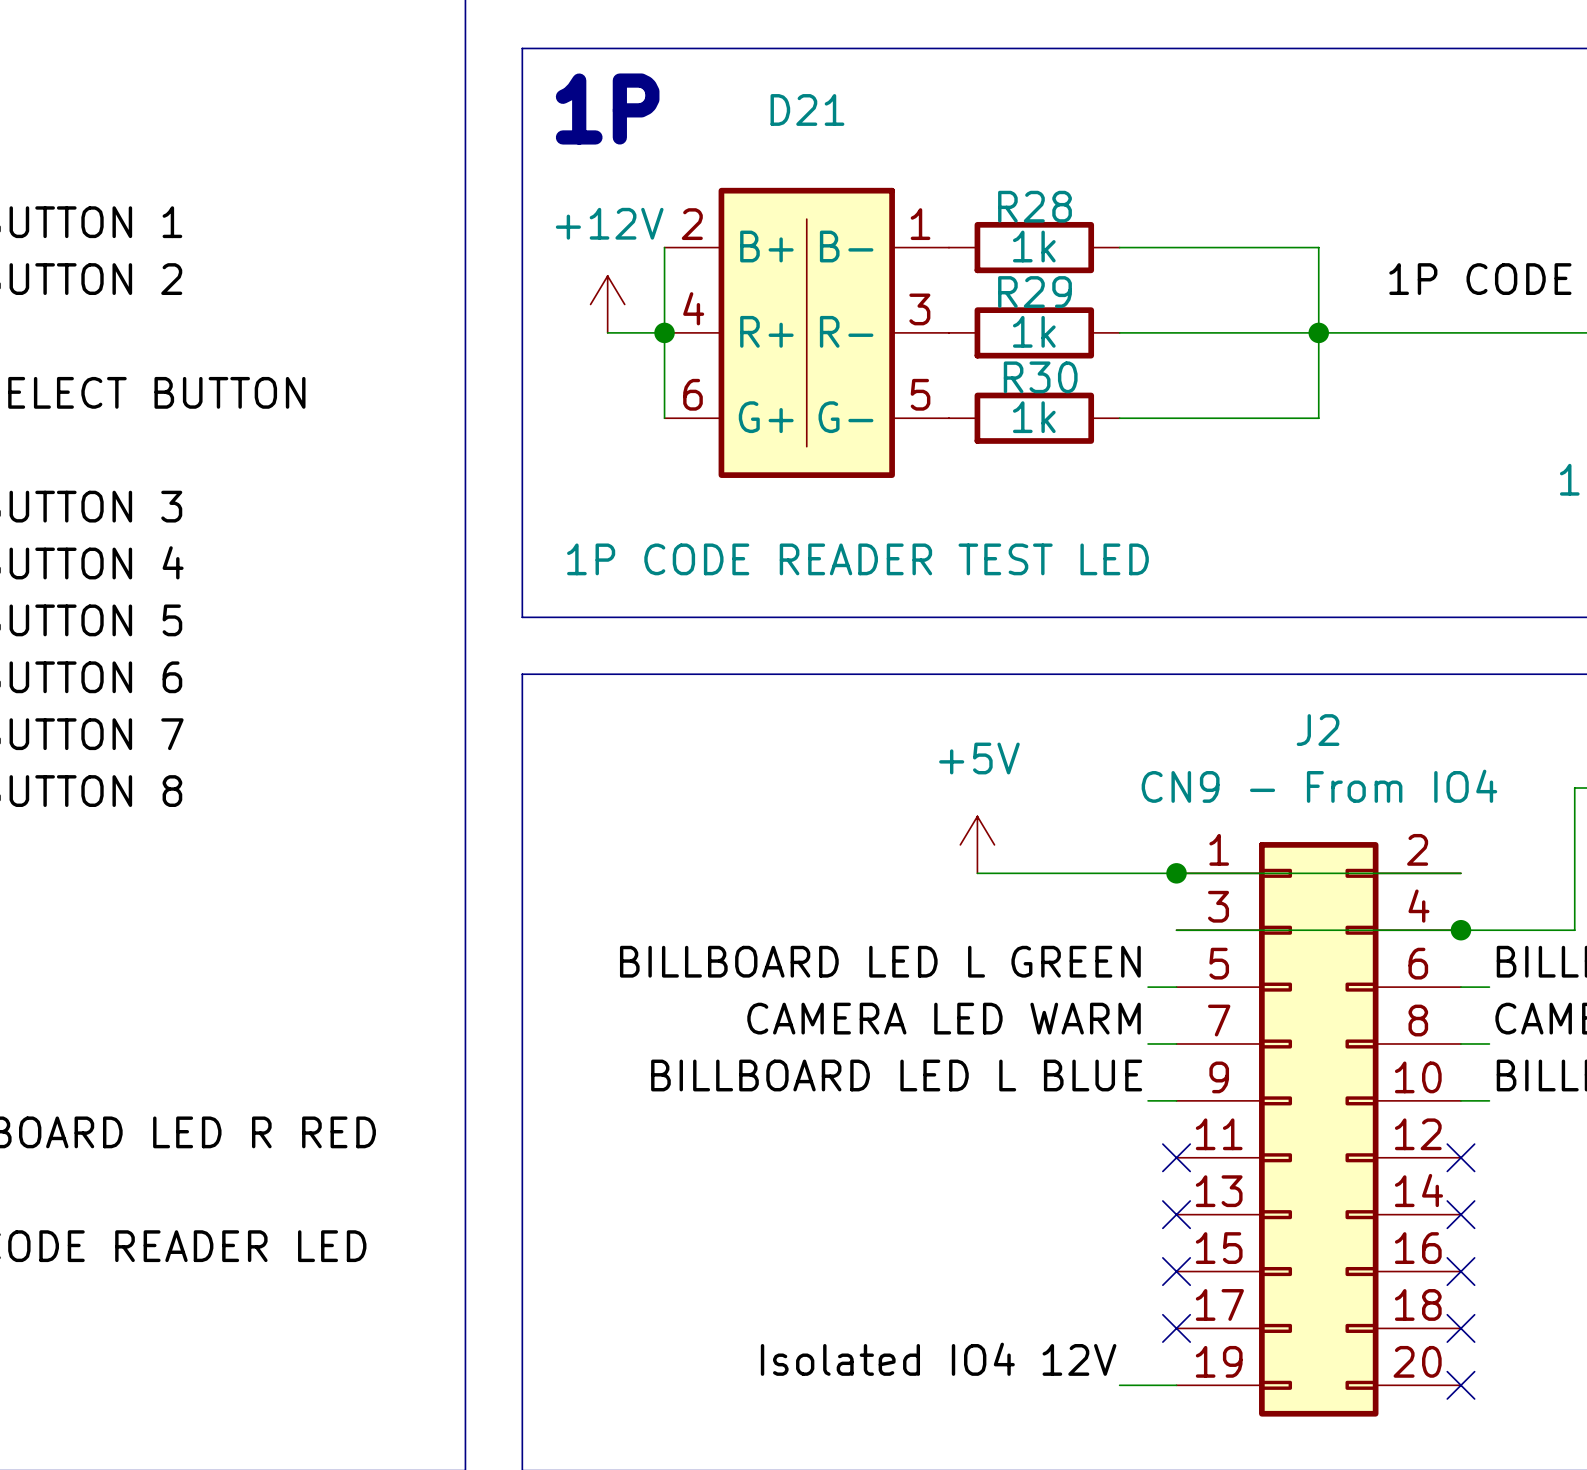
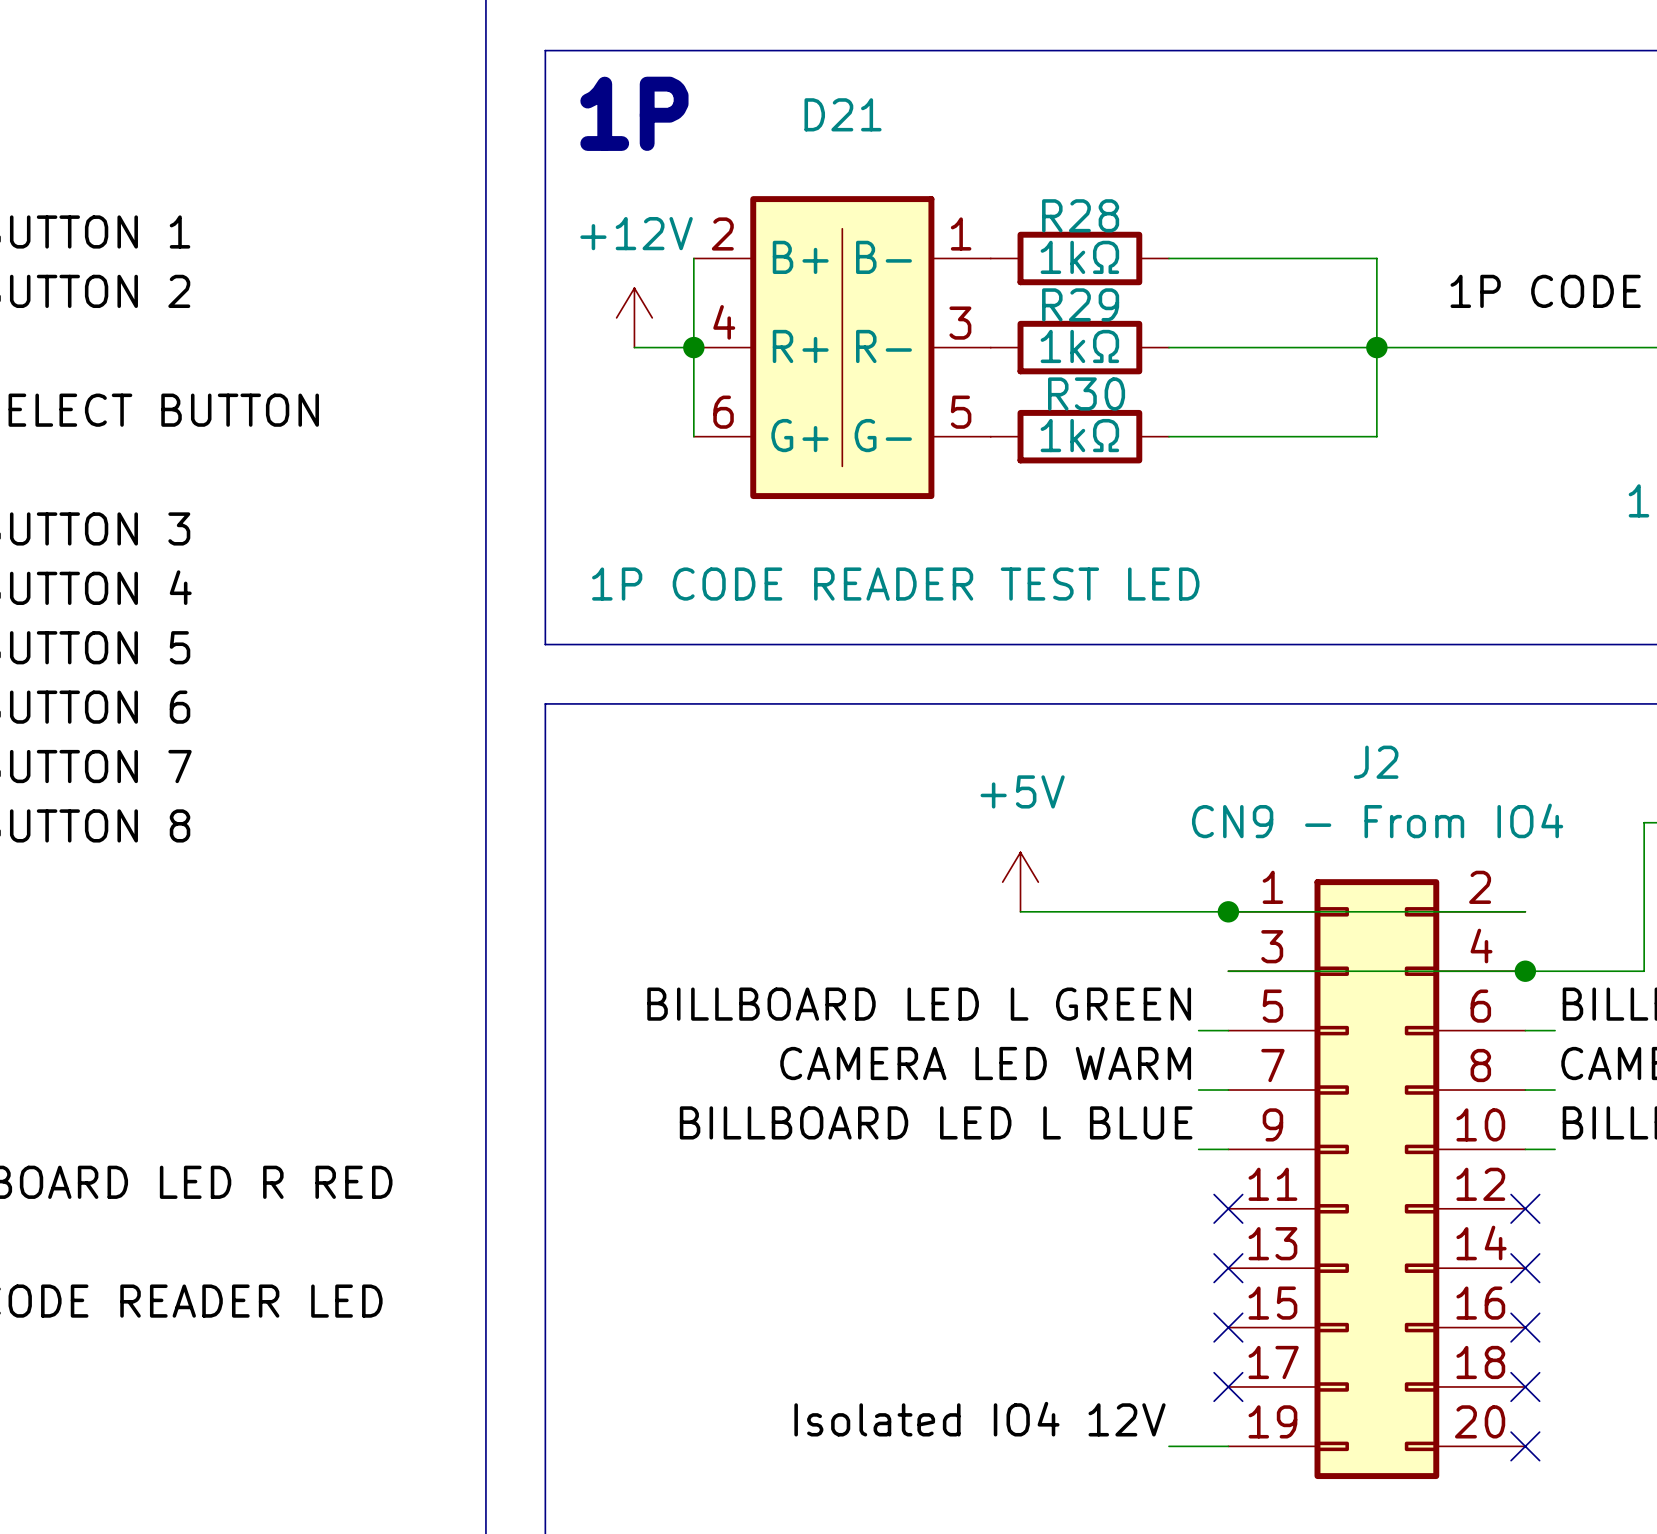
R28 value: 1k (1034, 246) -> 1kΩ (1079, 257)
R29 value: 1k (1034, 331) -> 1kΩ (1079, 346)
R30 value: 1k (1034, 417) -> 1kΩ (1079, 435)

